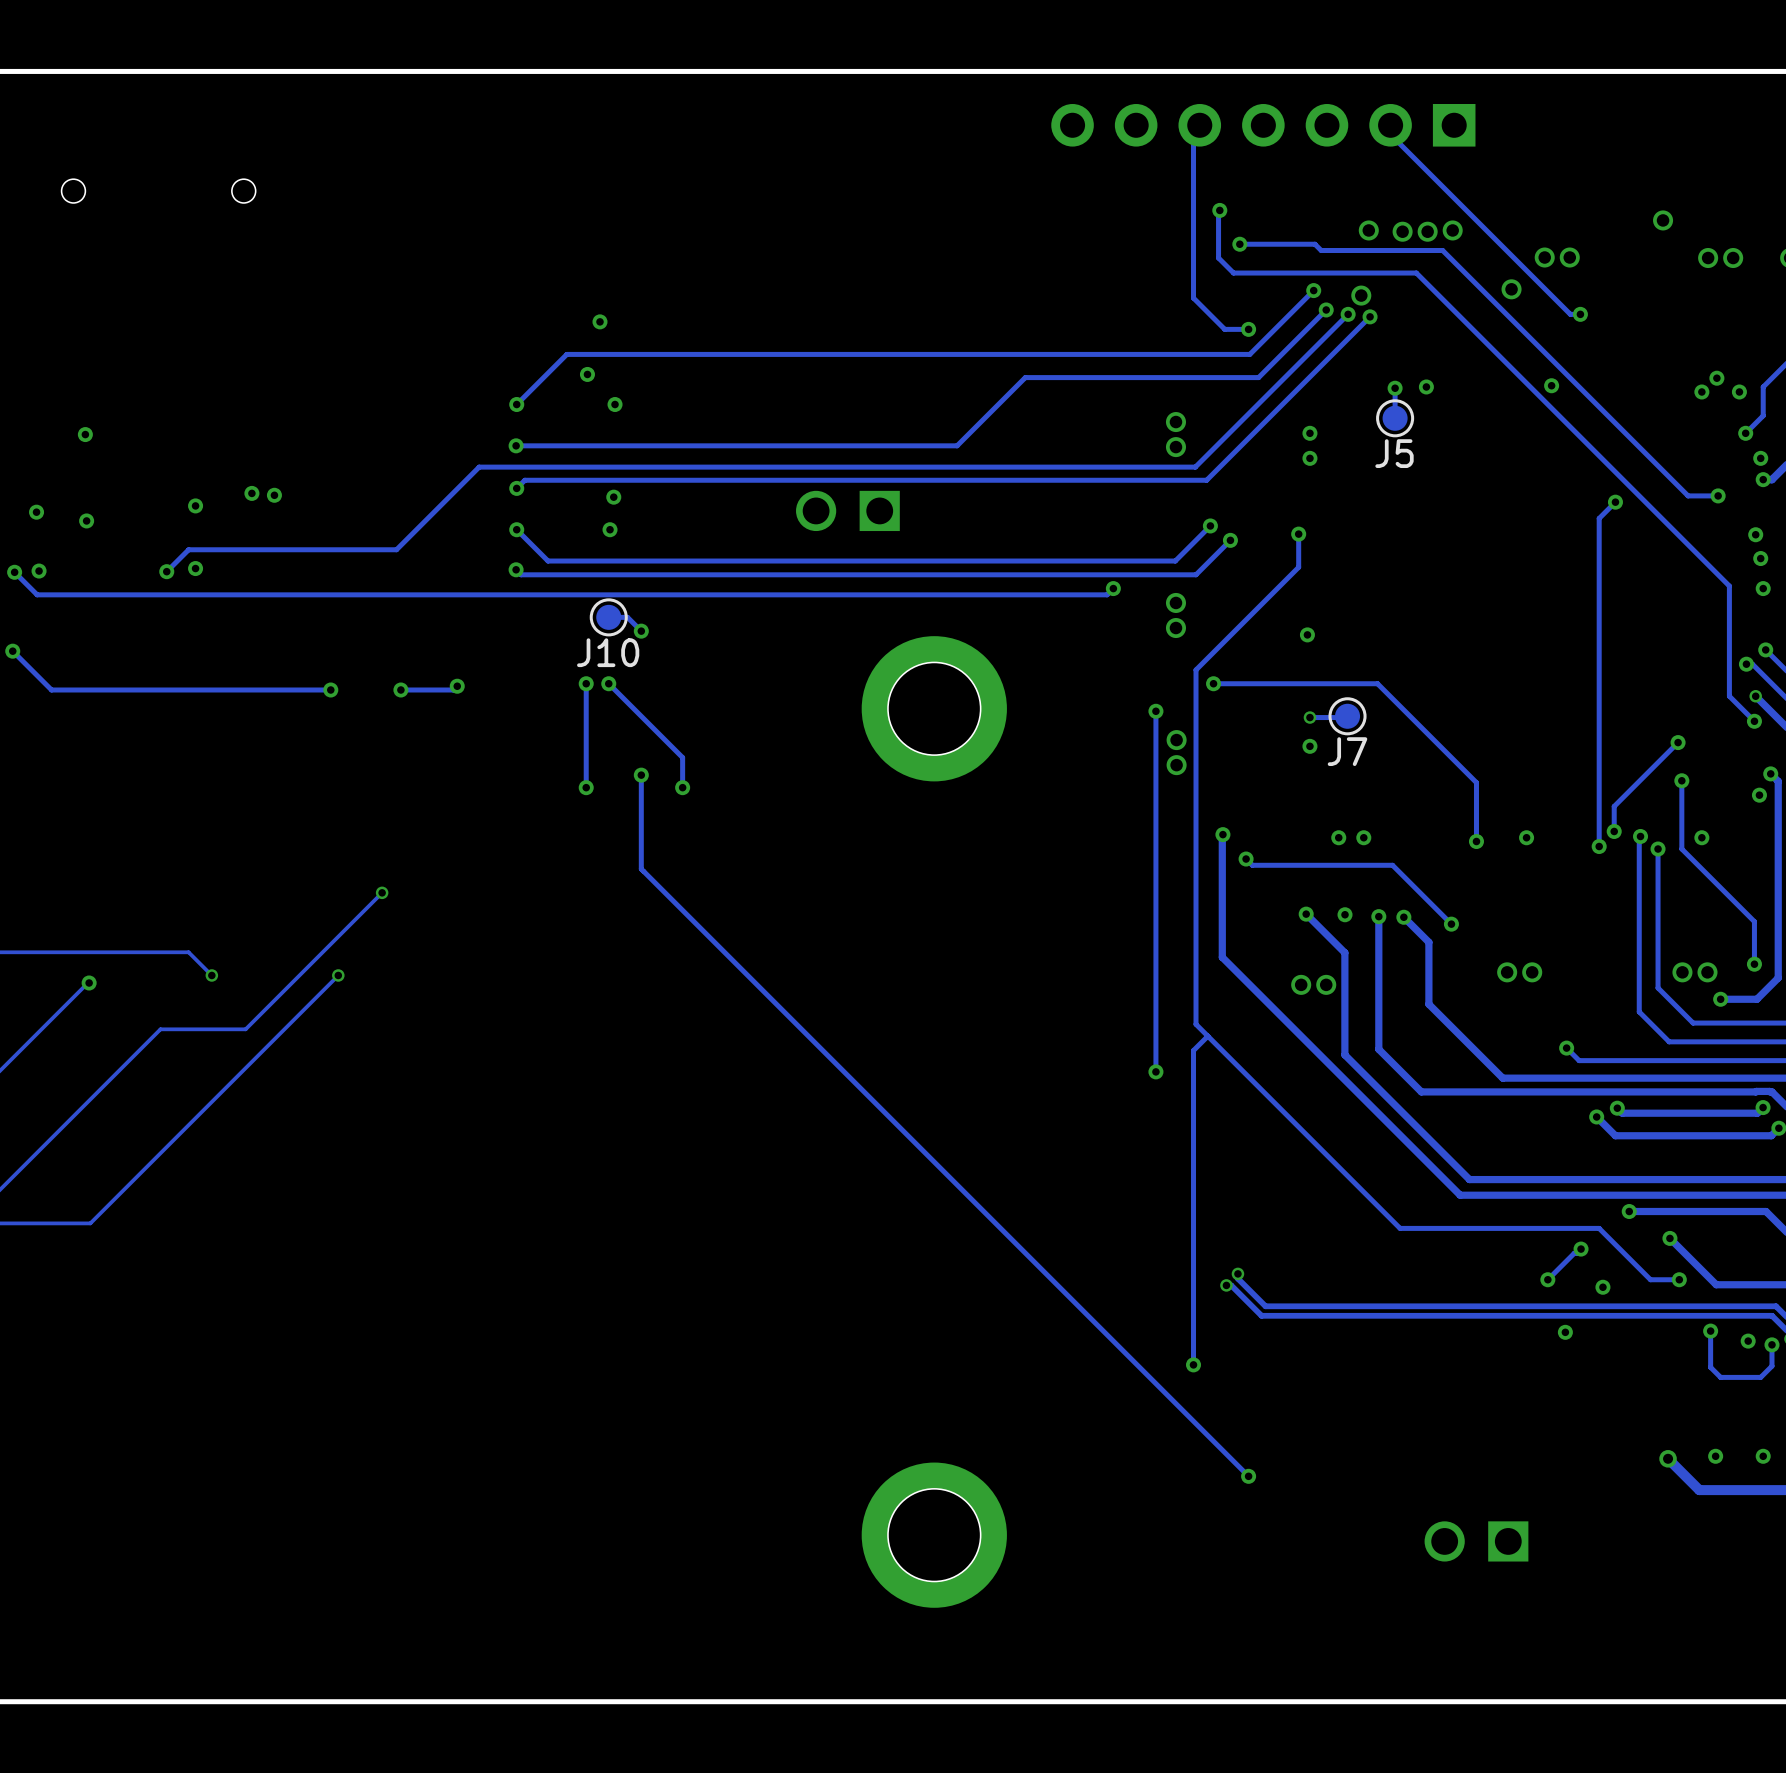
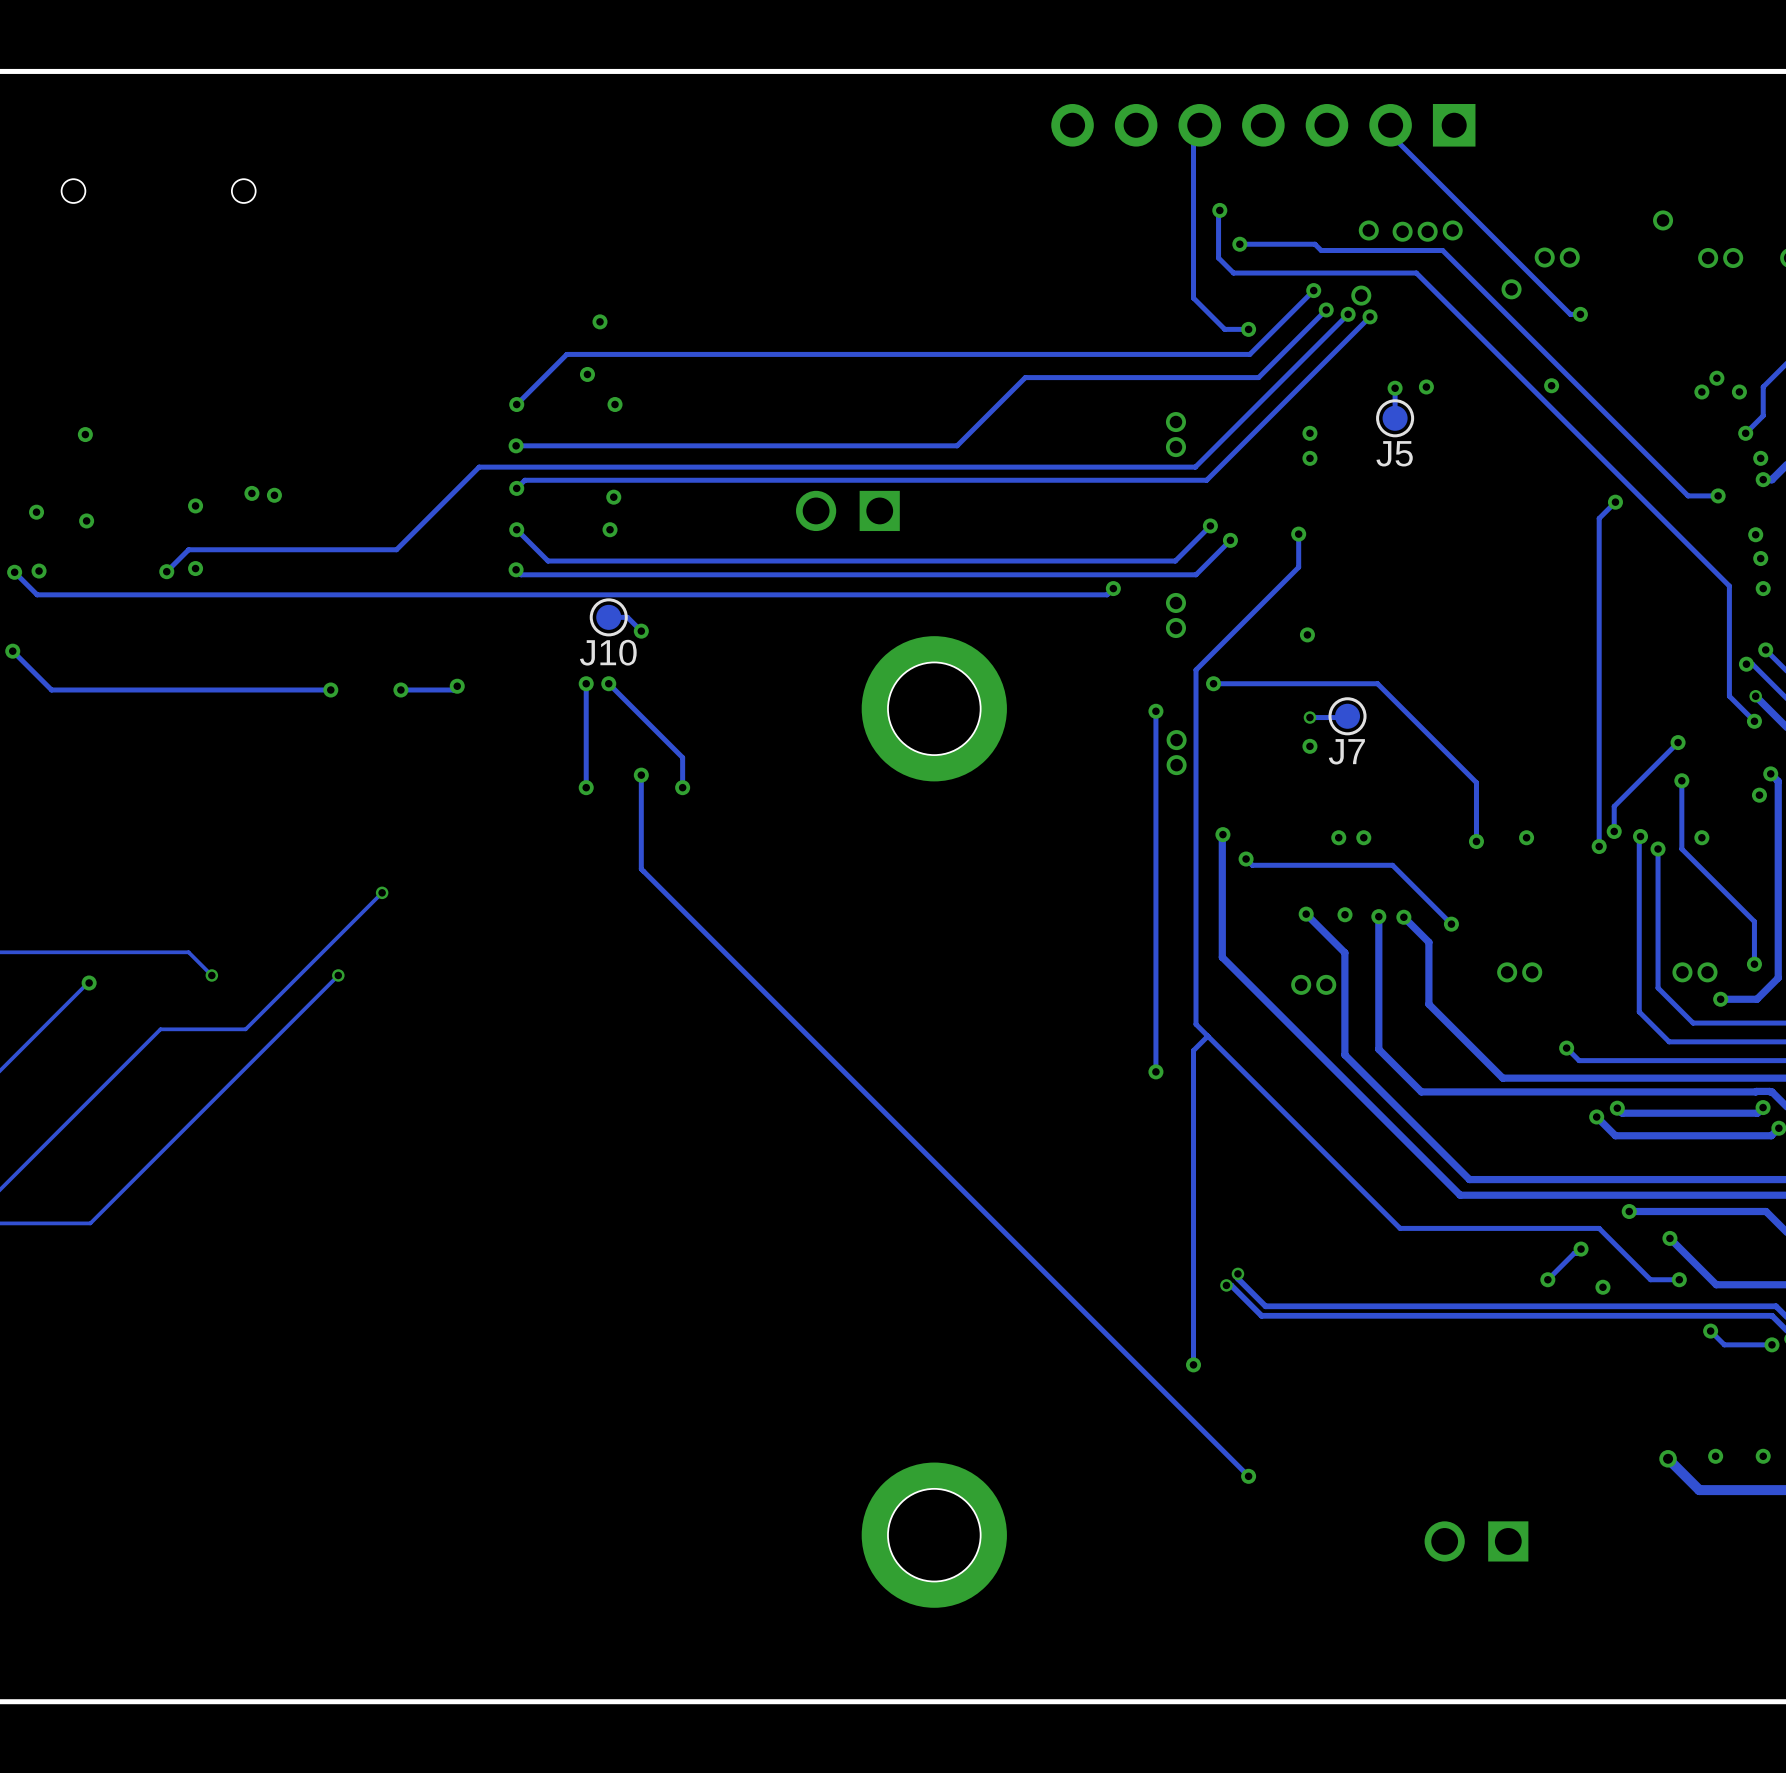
track: (1710, 1331) (1710, 1367) (1720, 1377) (1760, 1377) (1771, 1366) (1771, 1344) -> (1710, 1331) (1724, 1344) (1771, 1344)
via: (1565, 1332) -> none
via: (1748, 1341) -> none

